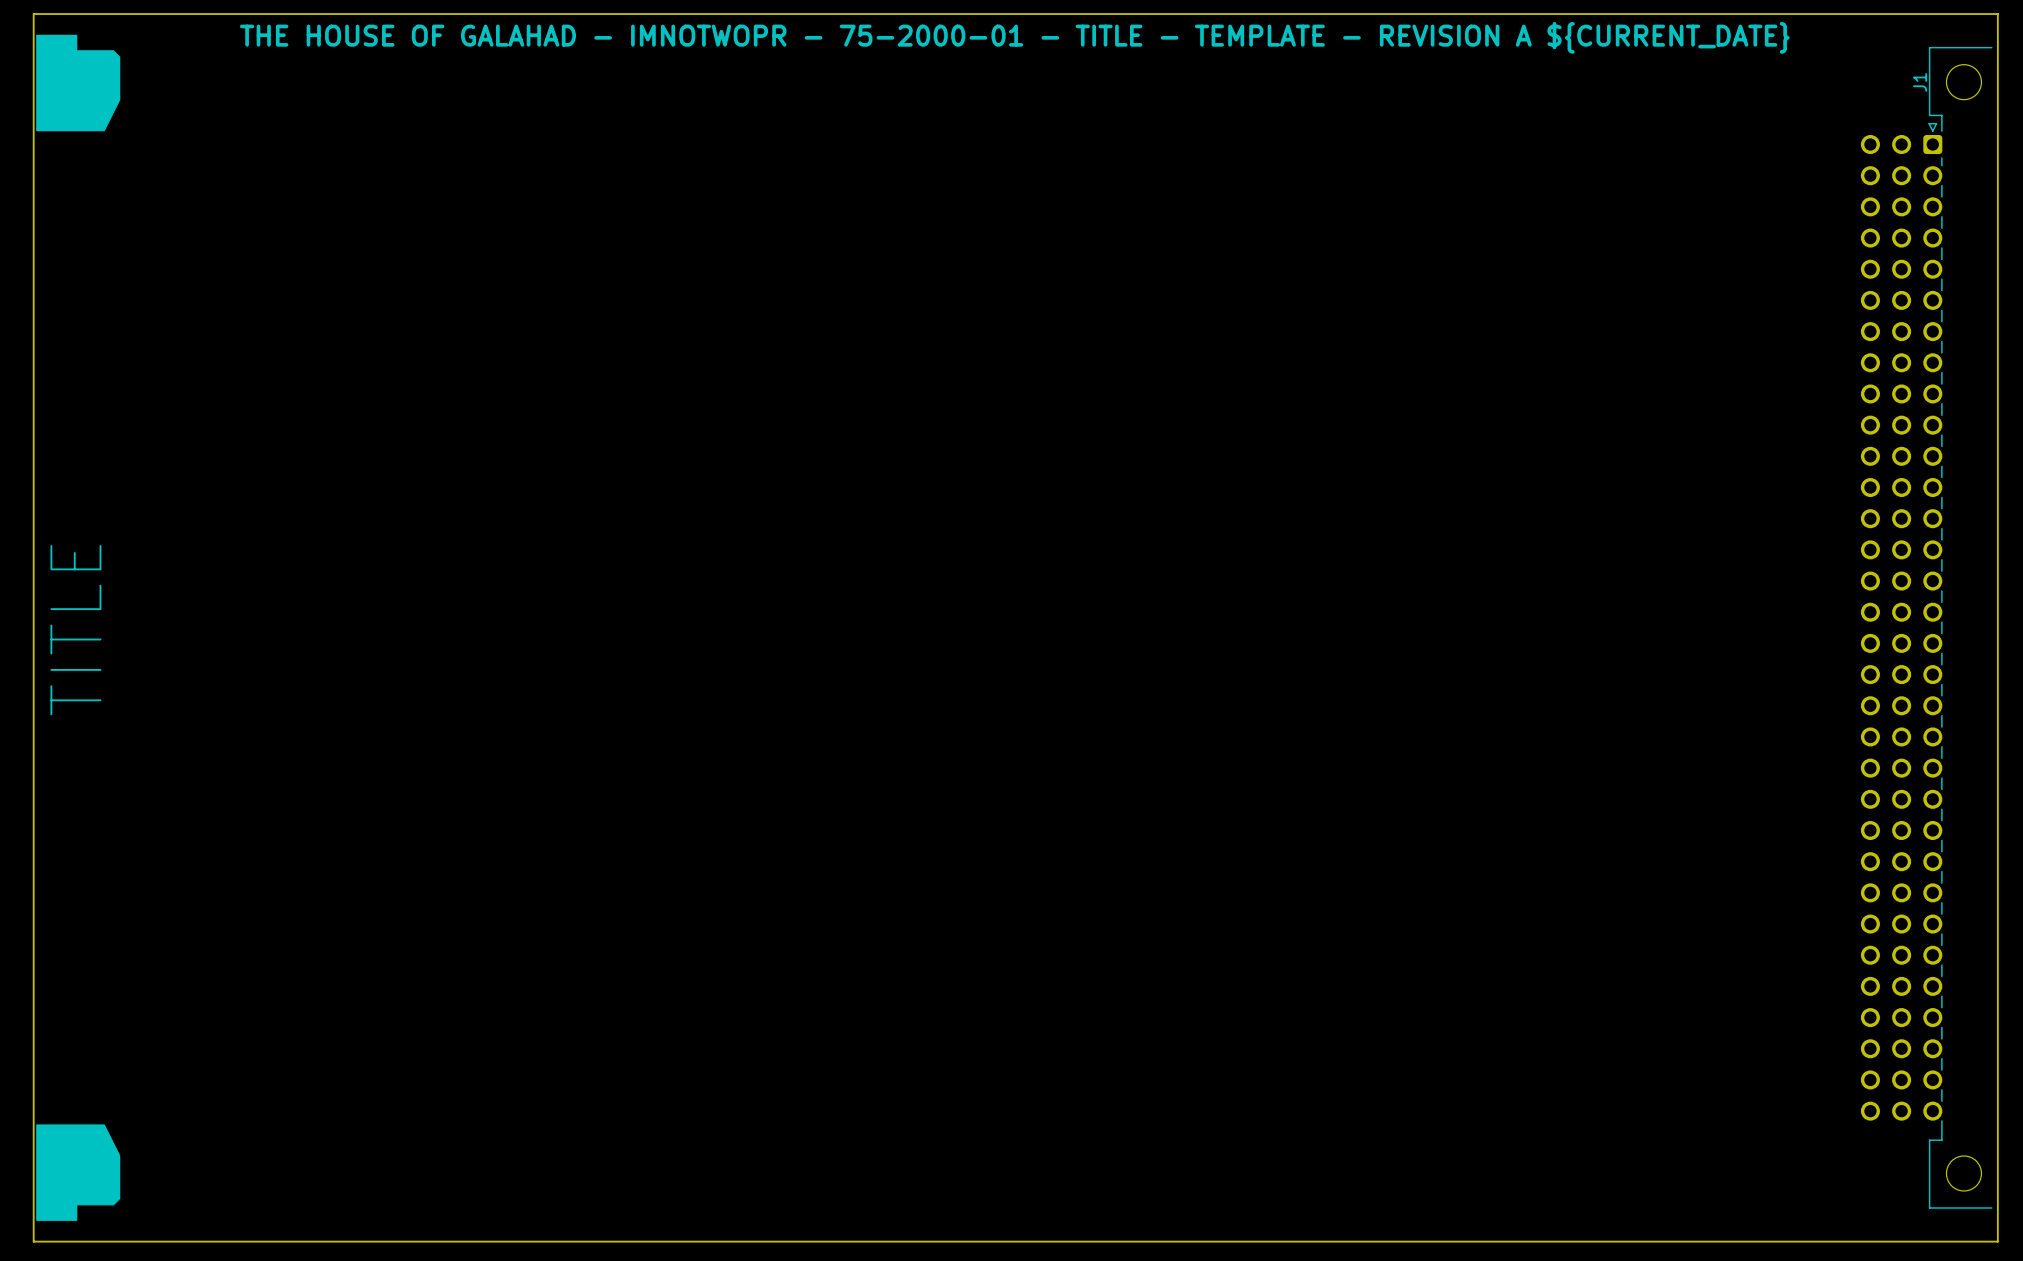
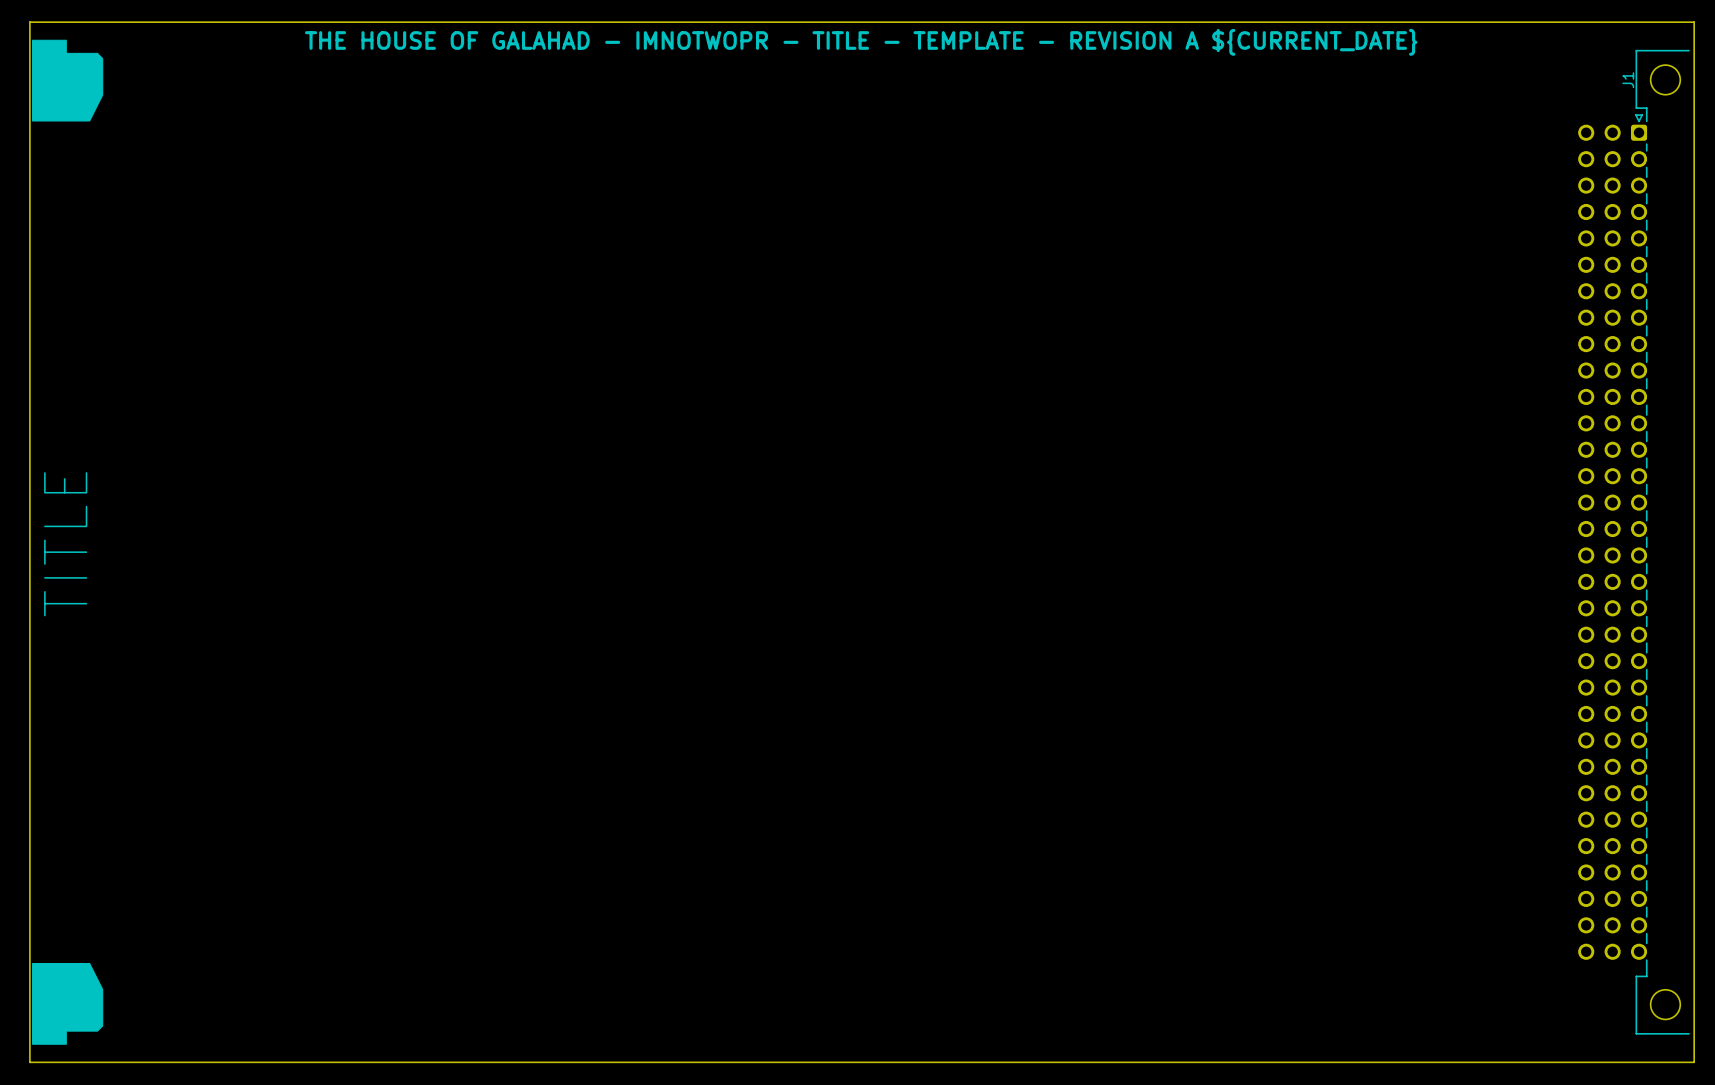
text: THE HOUSE OF GALAHAD - IMNOTWOPR - 75-2000-01 - TITLE - TEMPLATE - REVISION A ${CURRENT_DATE} (1014, 37) -> THE HOUSE OF GALAHAD - IMNOTWOPR - TITLE - TEMPLATE - REVISION A ${CURRENT_DATE} (861, 42)

